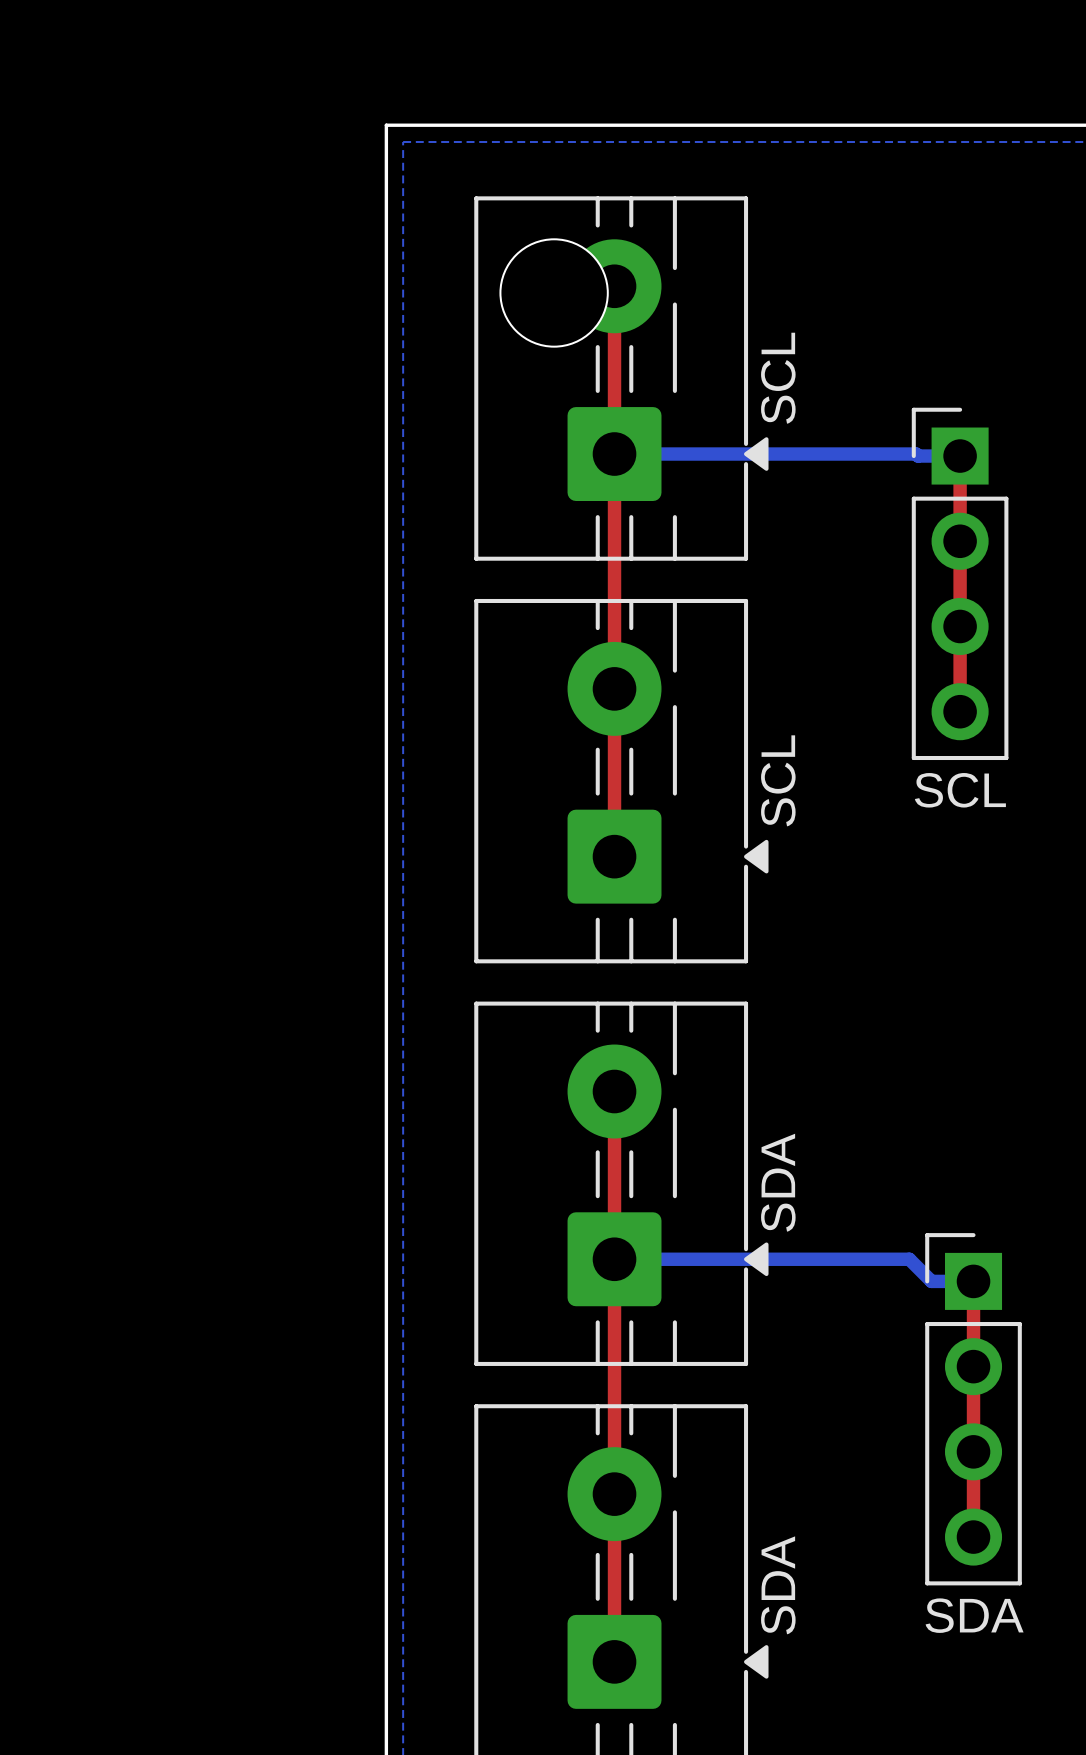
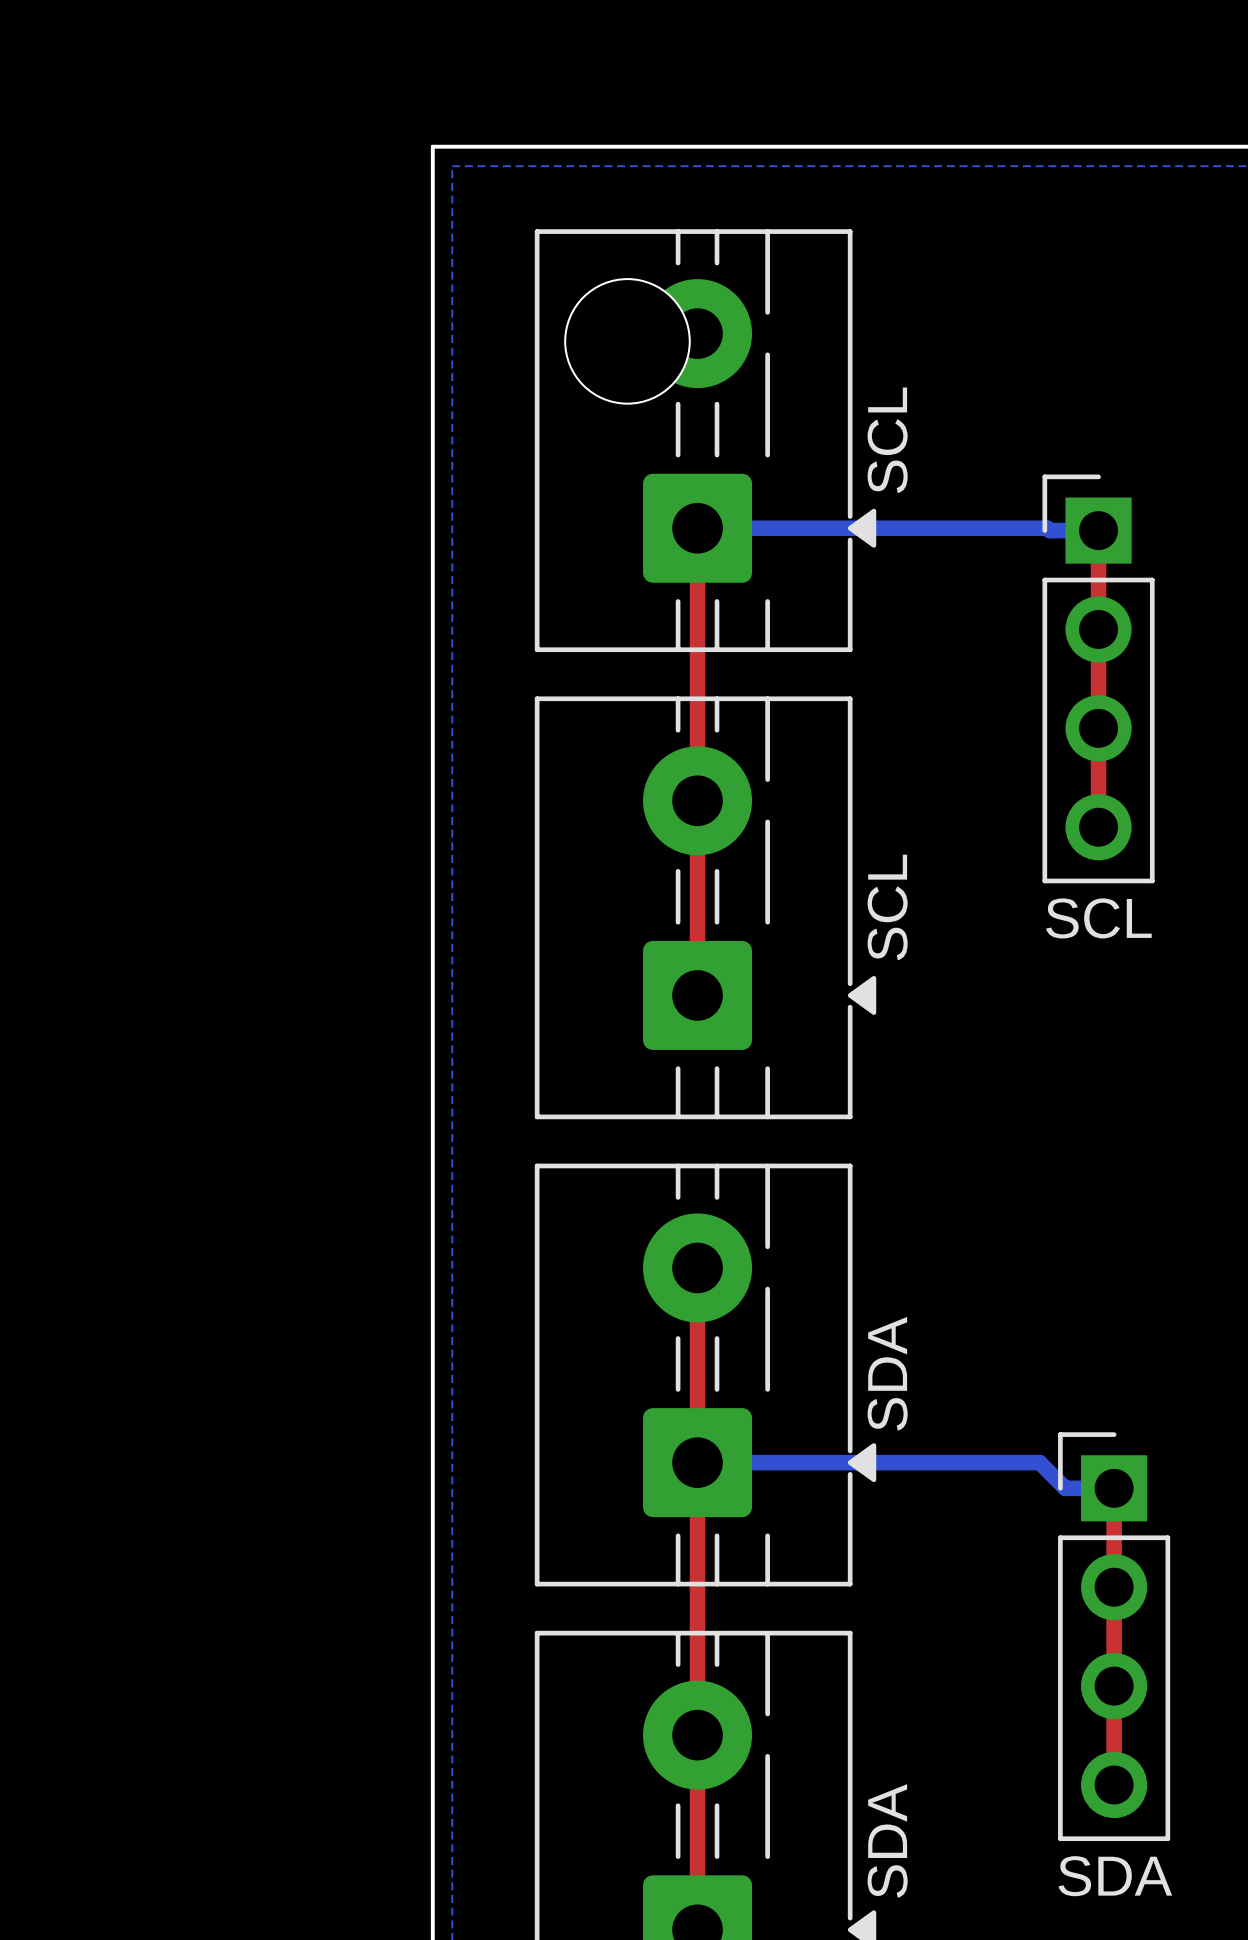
top track: (614, 286) (614, 454) -> none

